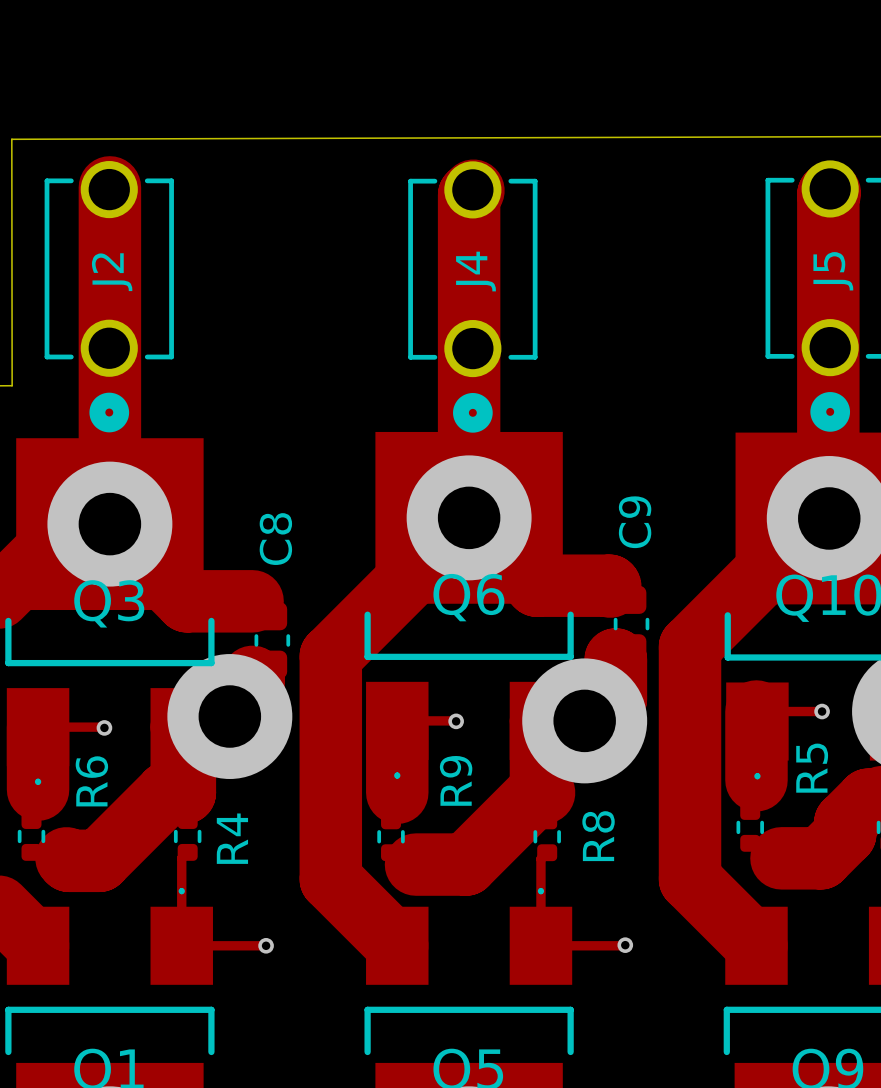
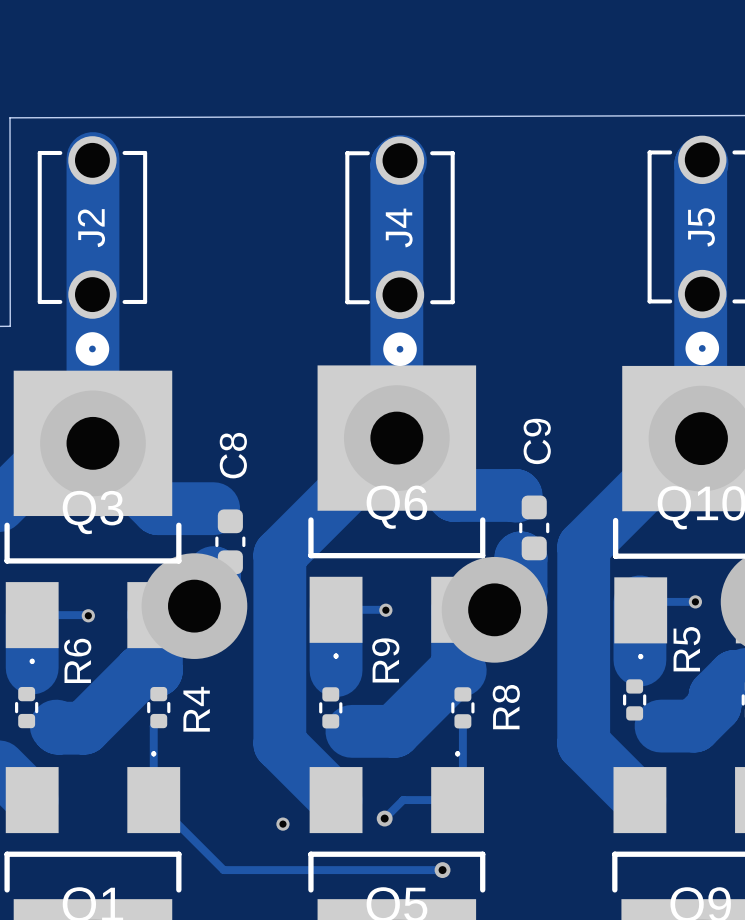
track: (547, 852) (540, 858) (540, 945) (625, 945) -> (462, 721) (462, 794) (457, 800) (403, 800) (384, 818)
track: (181, 945) (266, 945) -> (153, 800) (223, 870) (442, 870)
via position: (266, 945) -> (282, 824)
via: (625, 945) -> none
via: none -> (384, 818)
via: none -> (442, 870)

